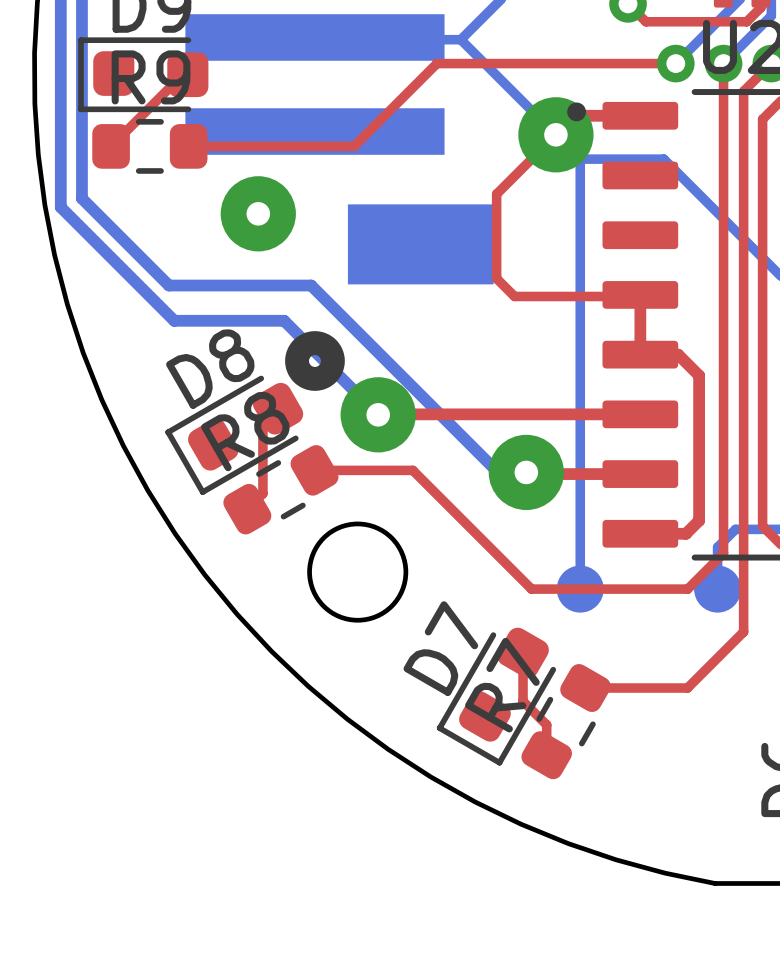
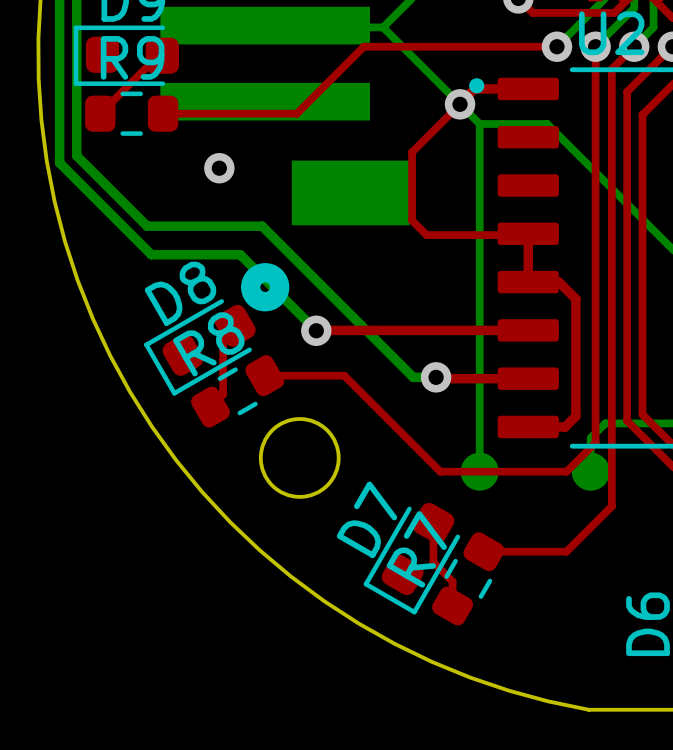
via size: [518, 97, 594, 173] -> [444, 89, 476, 120]
via size: [220, 176, 296, 252] -> [204, 153, 235, 184]
via size: [340, 377, 416, 453] -> [301, 315, 332, 346]
via size: [488, 434, 564, 511] -> [420, 362, 452, 393]

